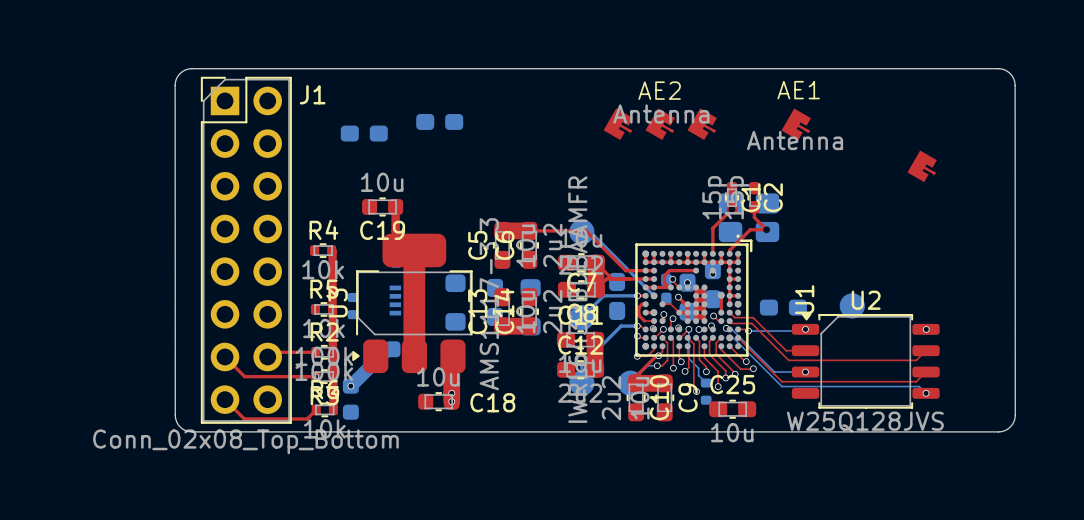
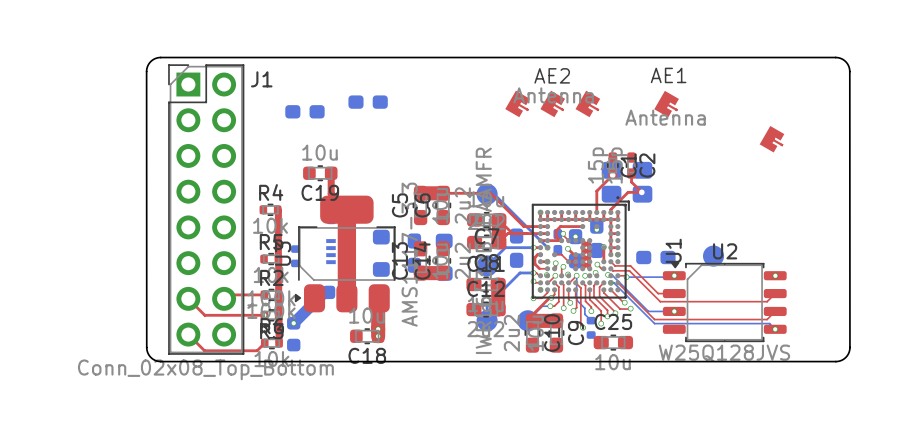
C18 name position: C18 (492, 402) -> C18 (367, 355)

